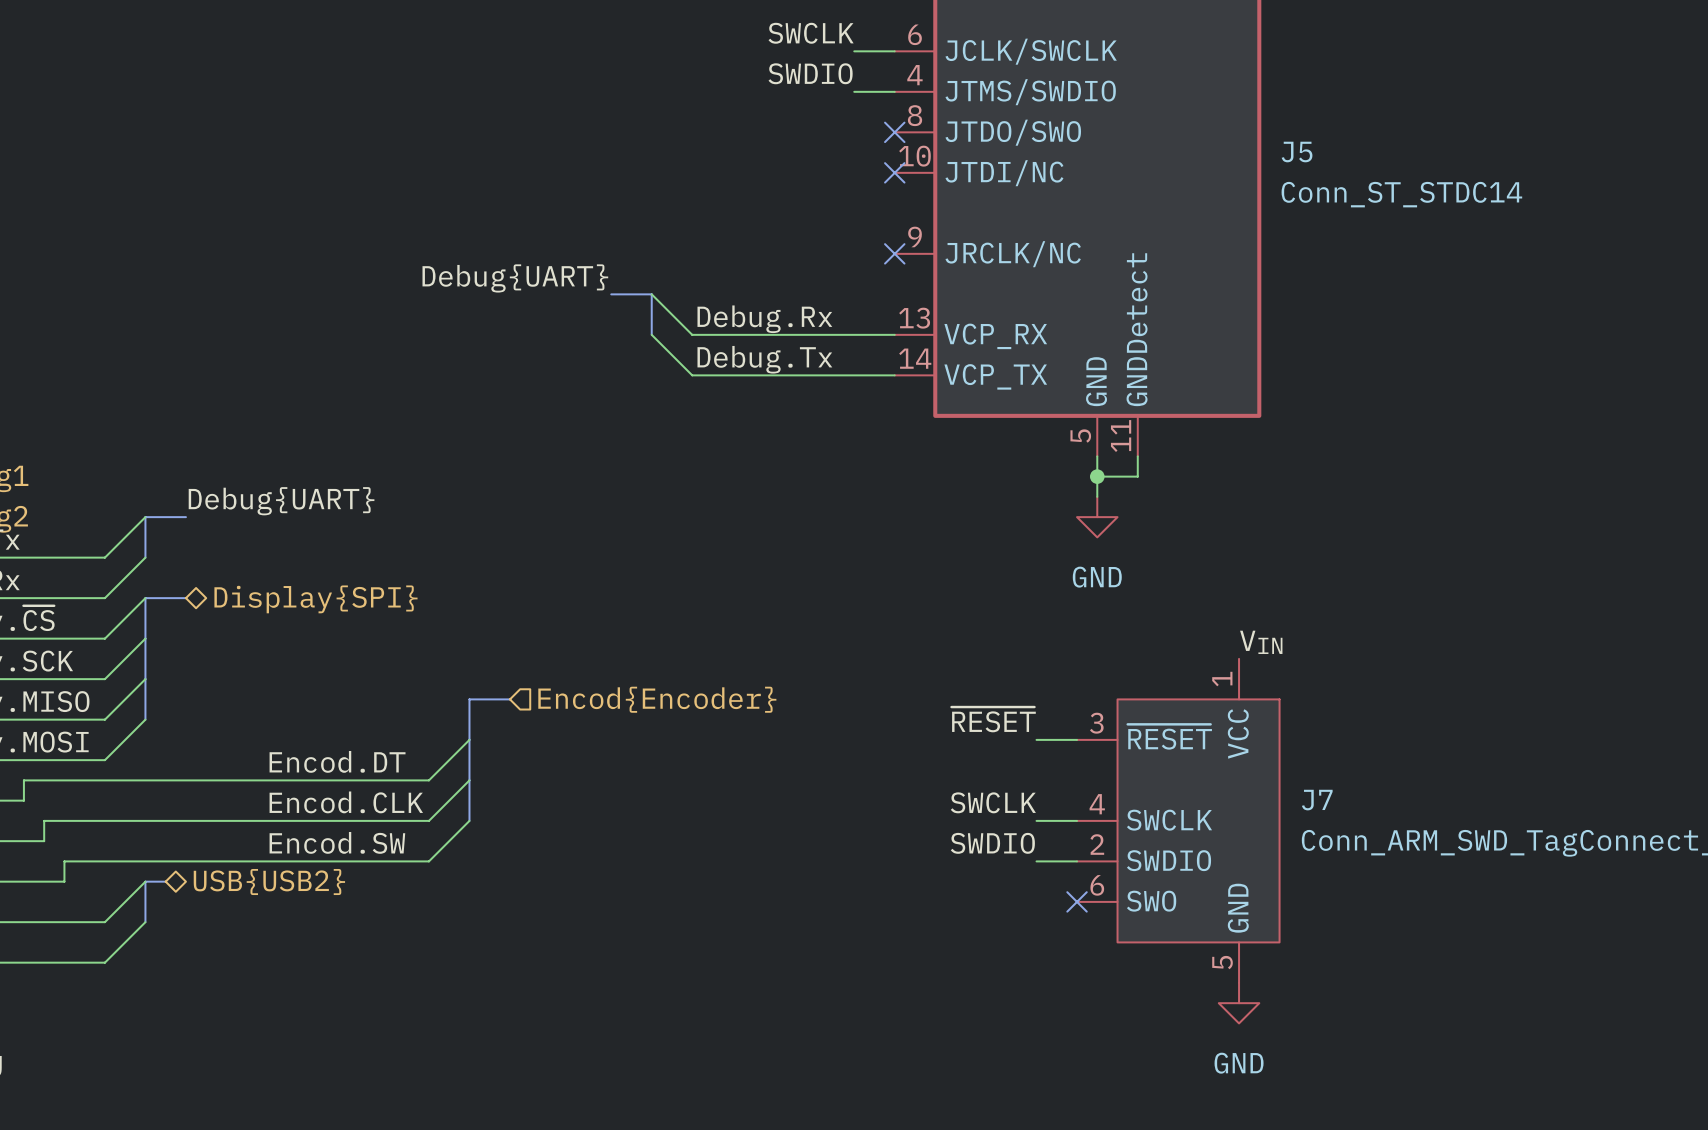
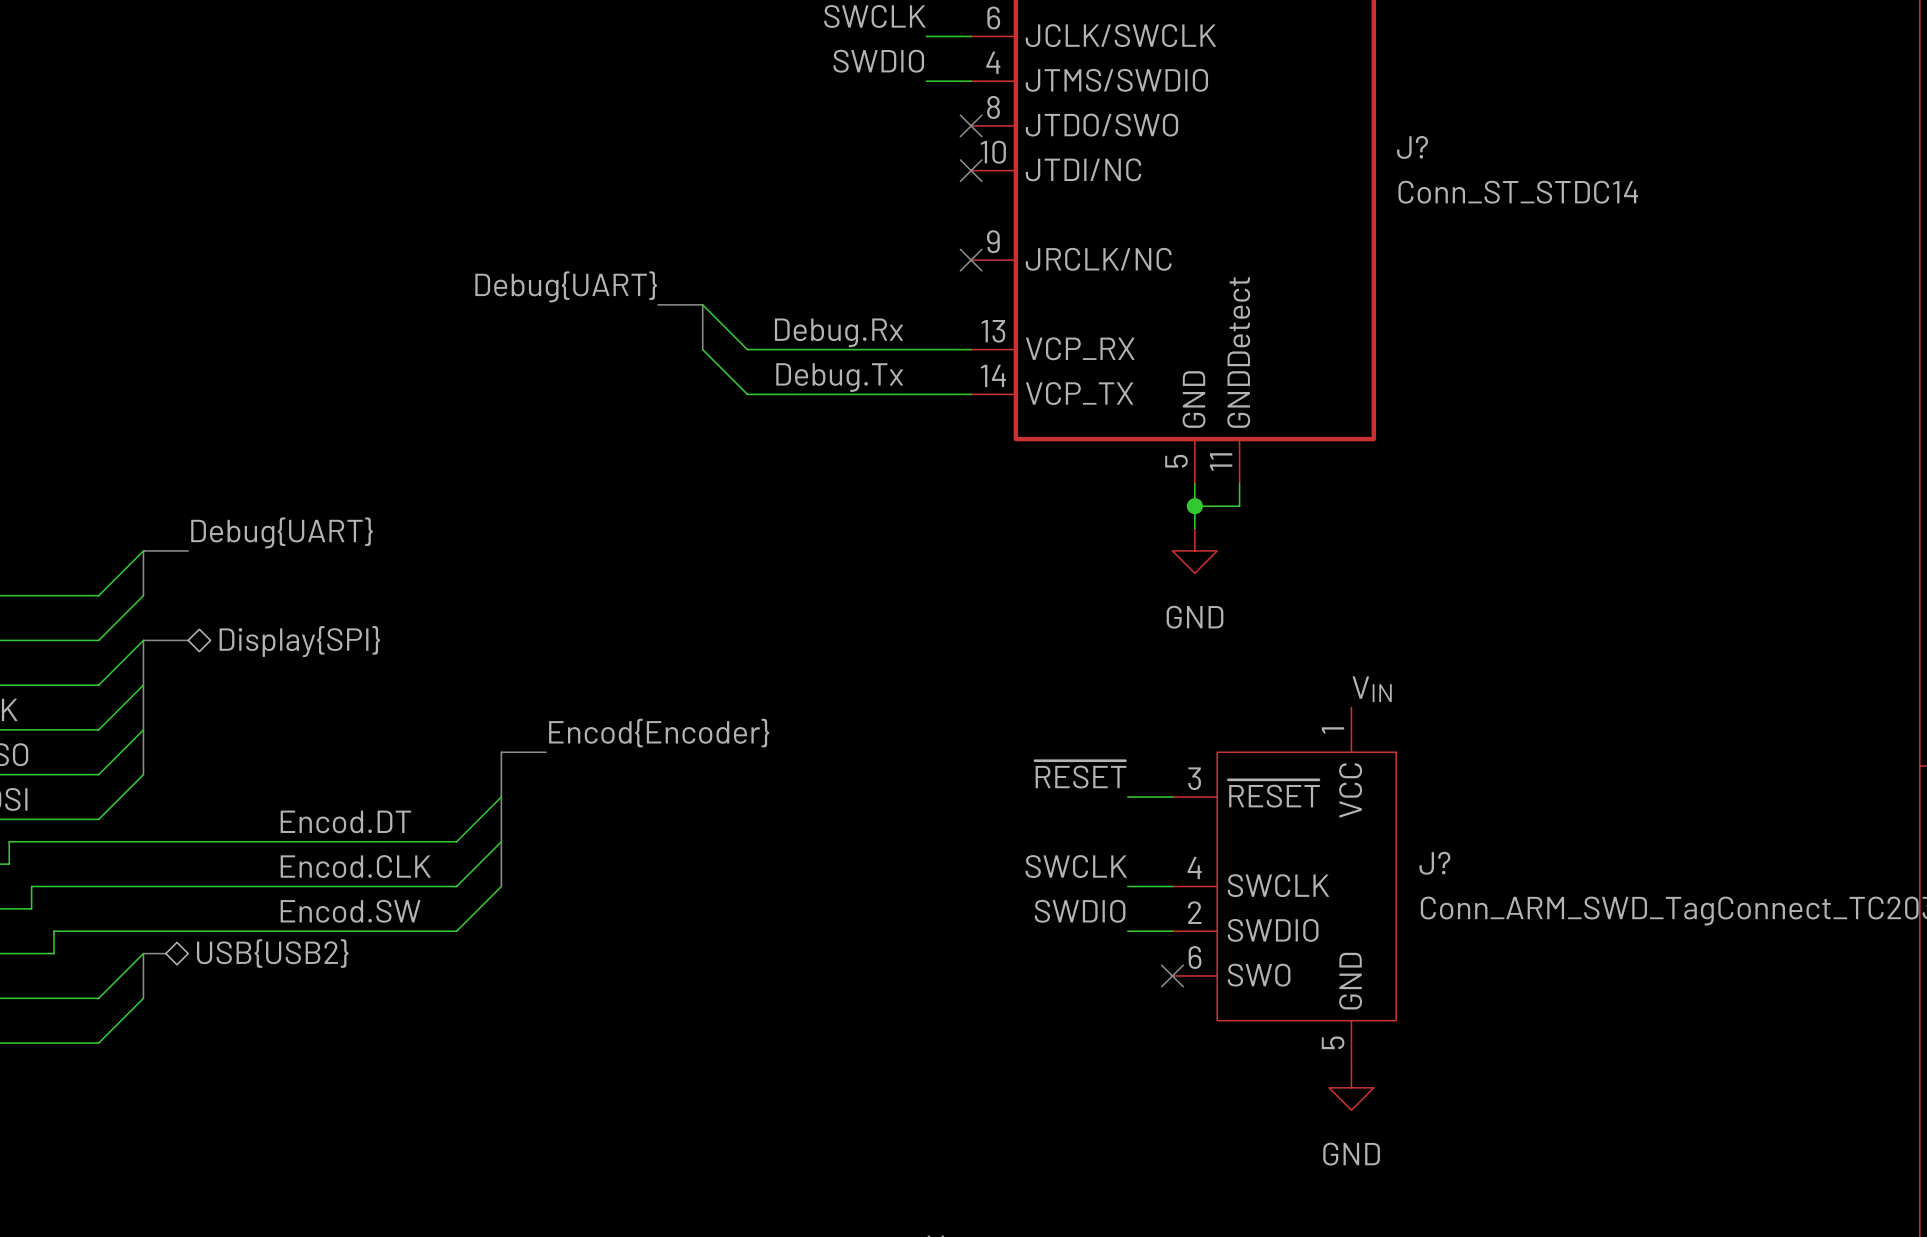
J5 name: J5 (1297, 152) -> J? (1412, 147)
label: none -> Encod{Encoder} (659, 733)
hierarchical label: Encod{Encoder} (657, 699) -> none
J7 name: J7 (1317, 800) -> J? (1434, 863)

